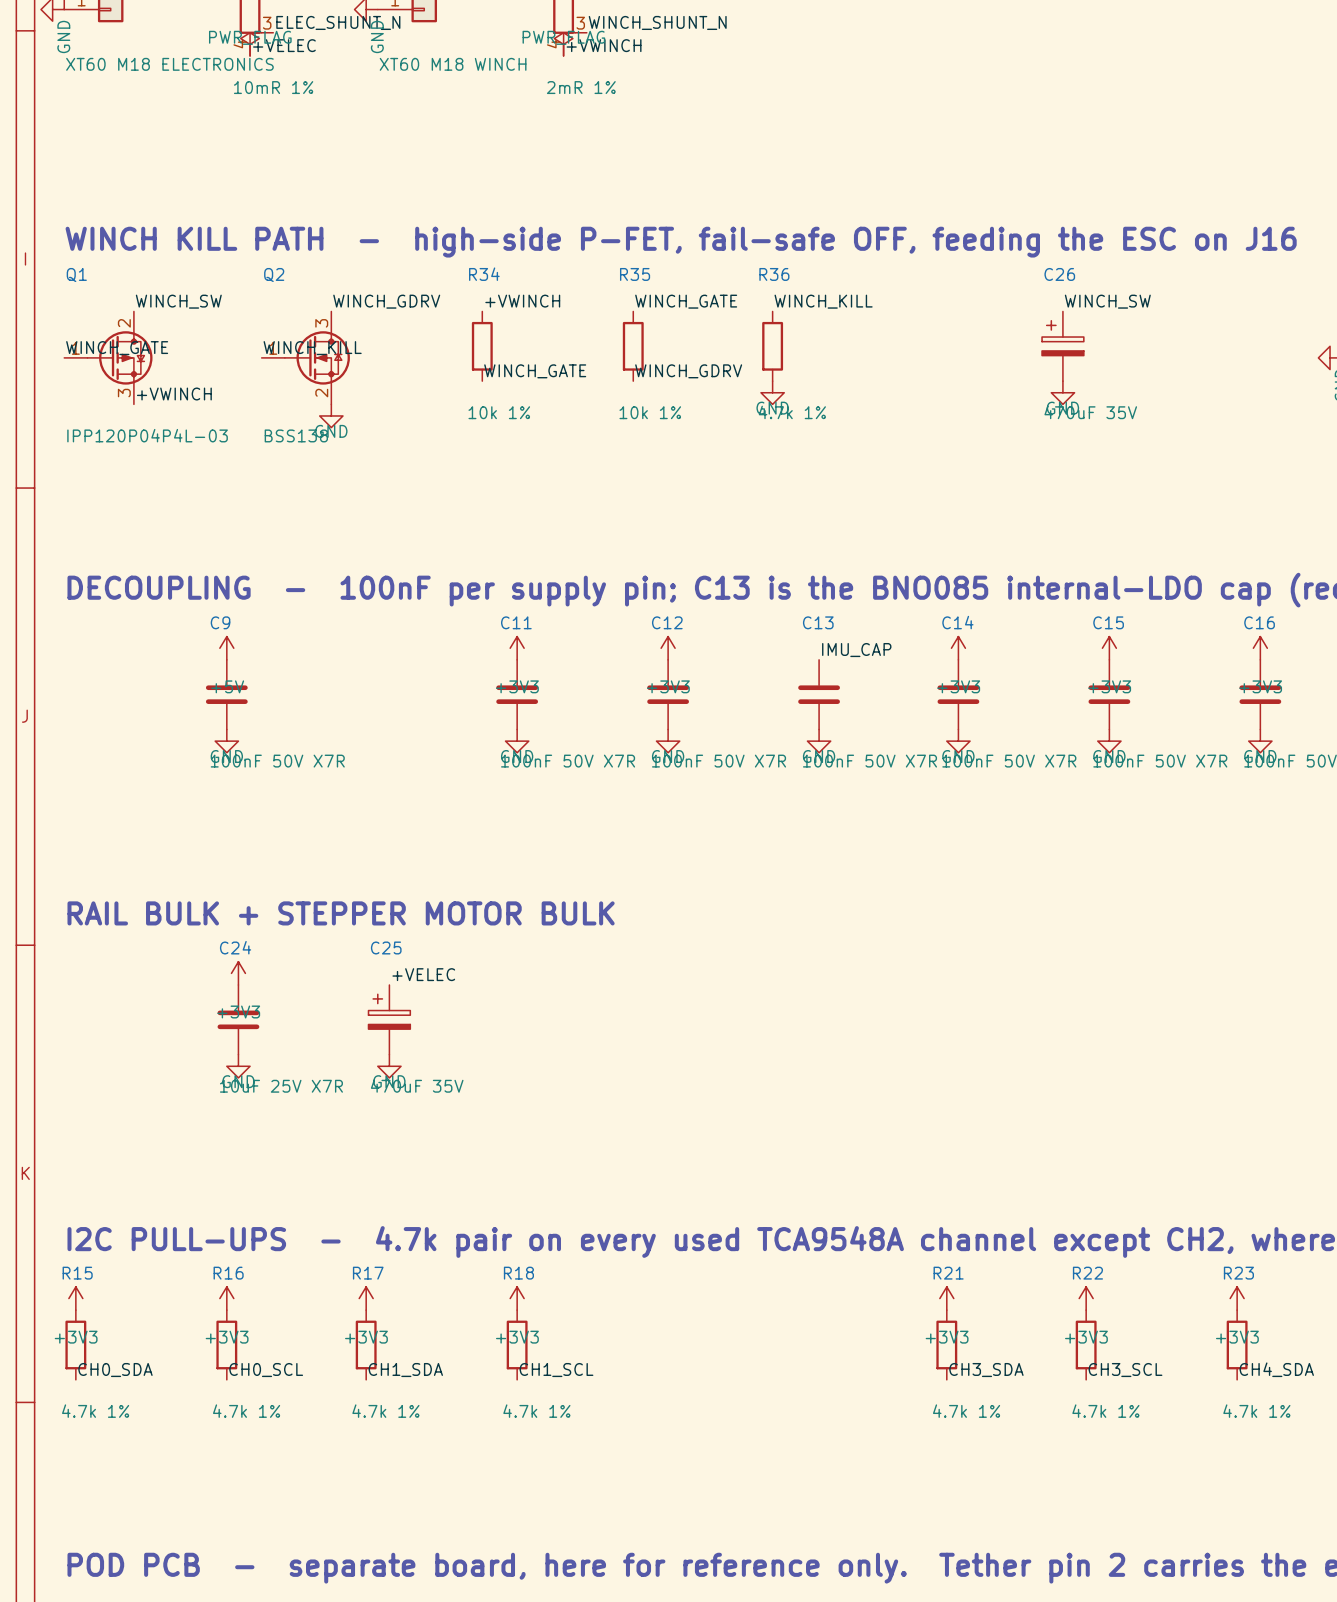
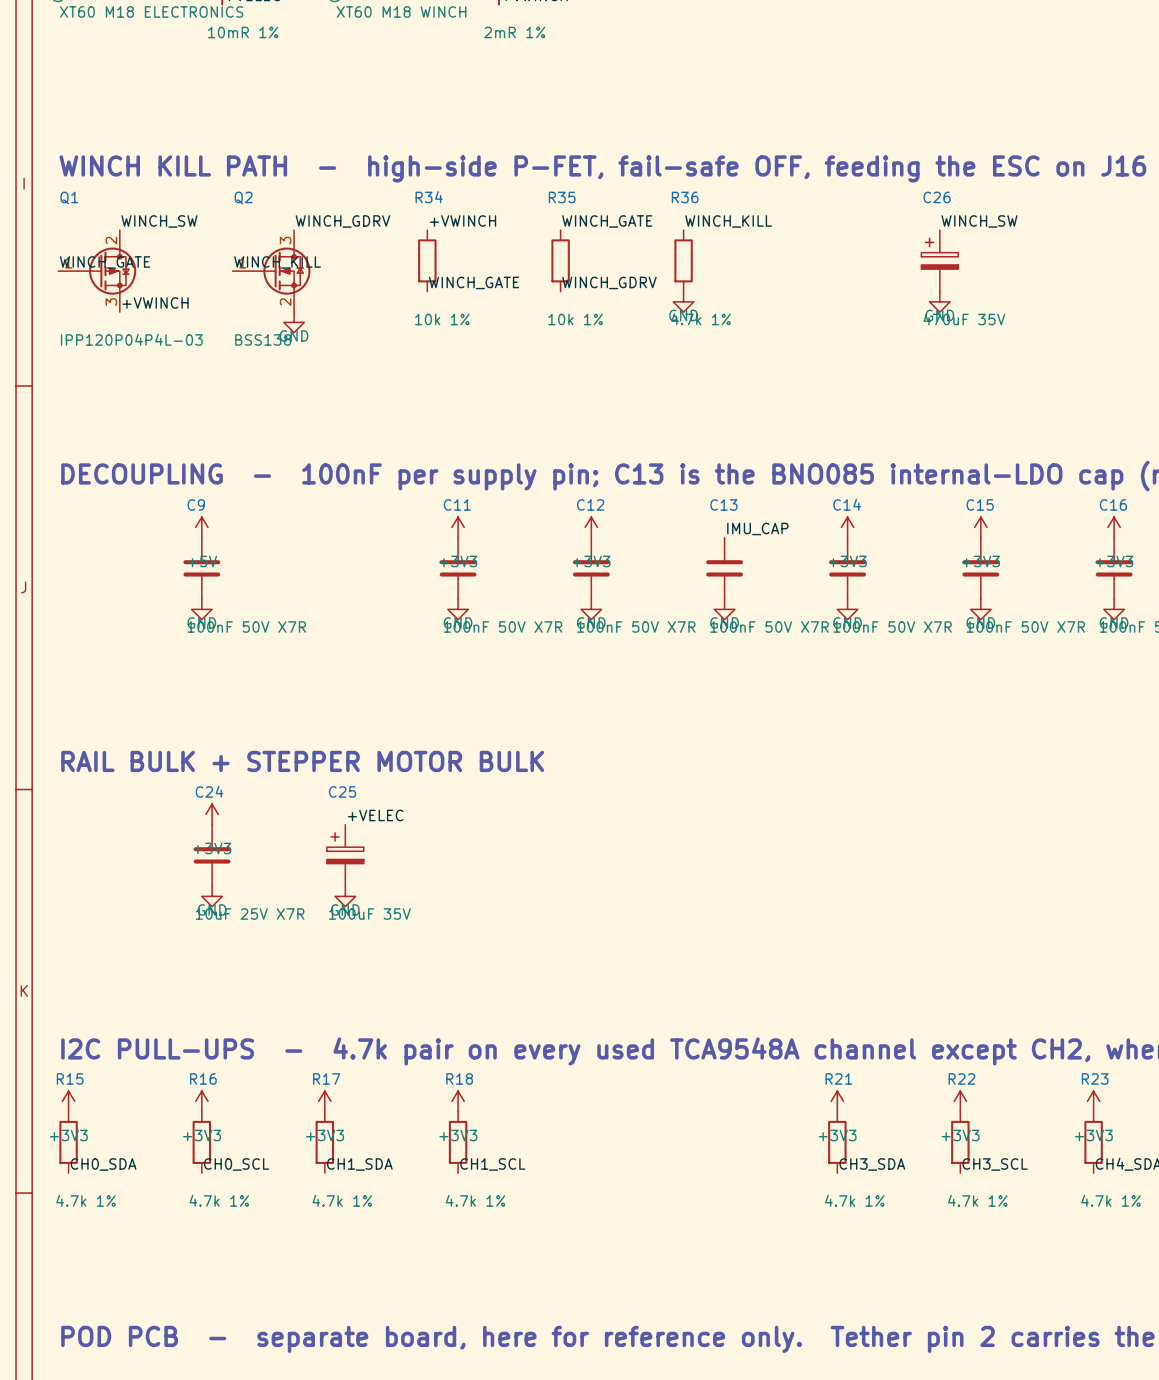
C25 value: 470uF 35V (417, 1085) -> 100uF 35V (369, 914)

